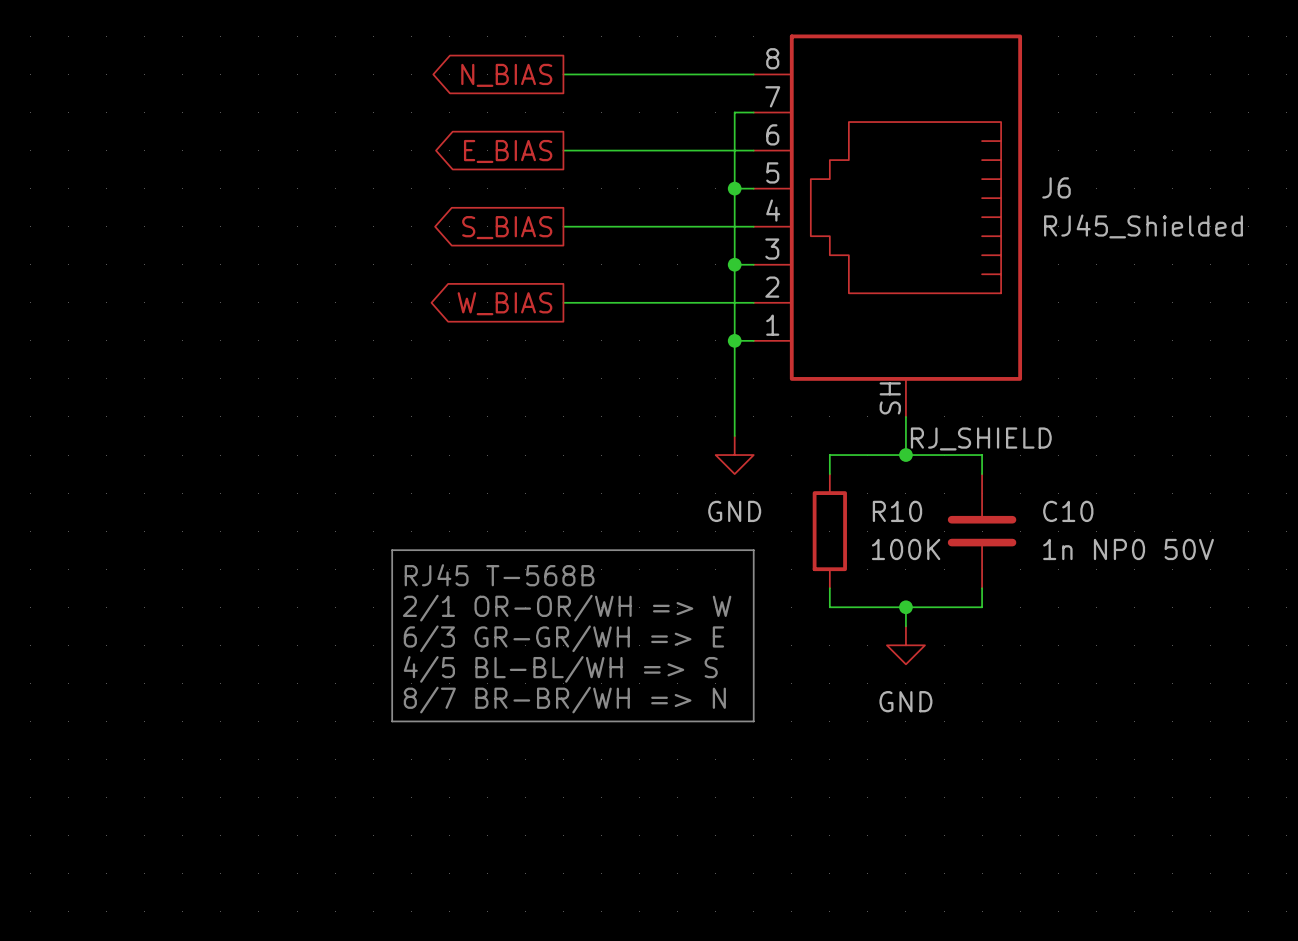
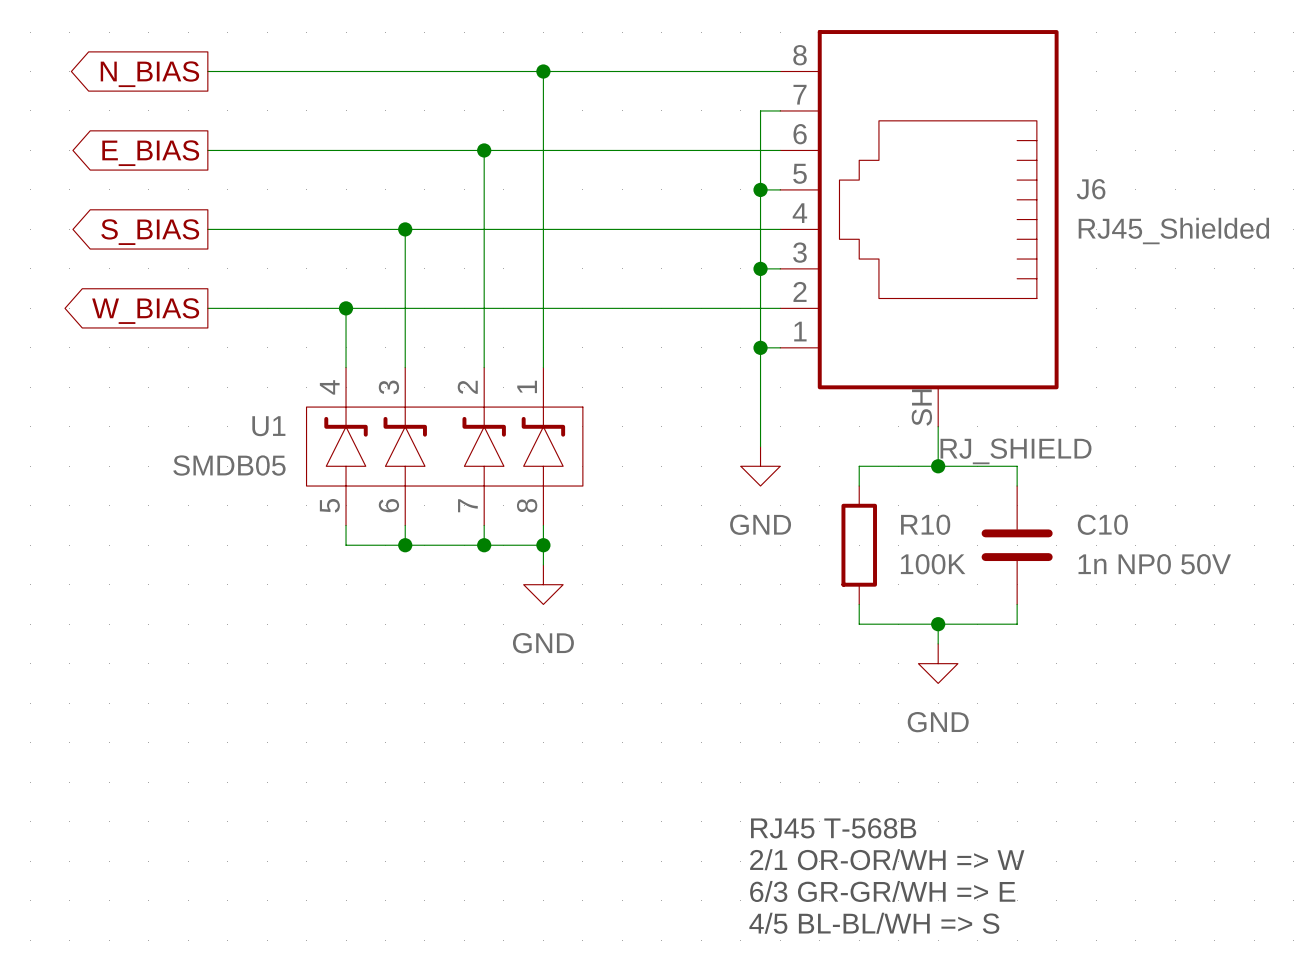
wire: none -> (207, 71) (582, 71)
wire: none -> (543, 71) (543, 367)
junction: none -> (543, 71)
global label position: N_BIAS (506, 75) -> N_BIAS (149, 74)
wire: none -> (207, 150) (582, 150)
wire: none -> (484, 150) (484, 367)
junction: none -> (484, 150)
global label position: E_BIAS (508, 151) -> E_BIAS (150, 153)
wire: none -> (207, 229) (582, 229)
wire: none -> (405, 229) (405, 367)
junction: none -> (405, 229)
global label position: S_BIAS (507, 227) -> S_BIAS (150, 232)
wire: none -> (207, 308) (582, 308)
wire: none -> (346, 308) (346, 367)
junction: none -> (346, 308)
global label position: W_BIAS (504, 303) -> W_BIAS (145, 311)
U1: none -> SMDB05 (444, 446)
wire: none -> (346, 525) (346, 545) (543, 545)
wire: none -> (405, 525) (405, 545)
wire: none -> (484, 525) (484, 545)
wire: none -> (543, 525) (543, 564)
junction: none -> (405, 545)
junction: none -> (484, 545)
junction: none -> (543, 545)
line: (392, 550) (753, 550) (753, 721) (392, 721) (392, 550) -> none
power symbol: none -> GND (543, 584)
text: RJ45 T-568B (499, 575) -> none
text: 2/1 OR-OR/WH => W (567, 608) -> none
text: 6/3 GR-GR/WH => E (563, 638) -> none
text: 4/5 BL-BL/WH => S (560, 669) -> none
text: 8/7 BR-BR/WH => N (564, 700) -> none
text: none -> RJ45 T-568B (833, 828)
text: none -> 2/1 OR-OR/WH => W (887, 859)
text: none -> 6/3 GR-GR/WH => E (882, 891)
text: none -> 4/5 BL-BL/WH => S (874, 923)

